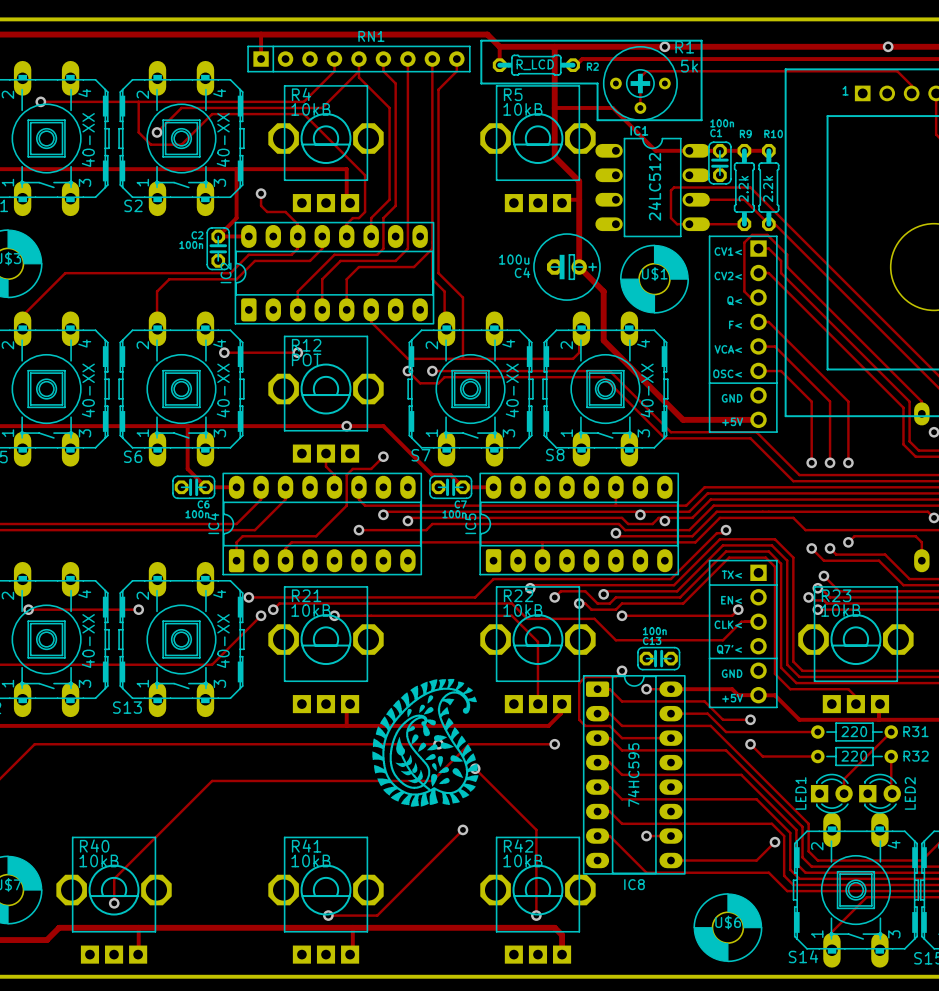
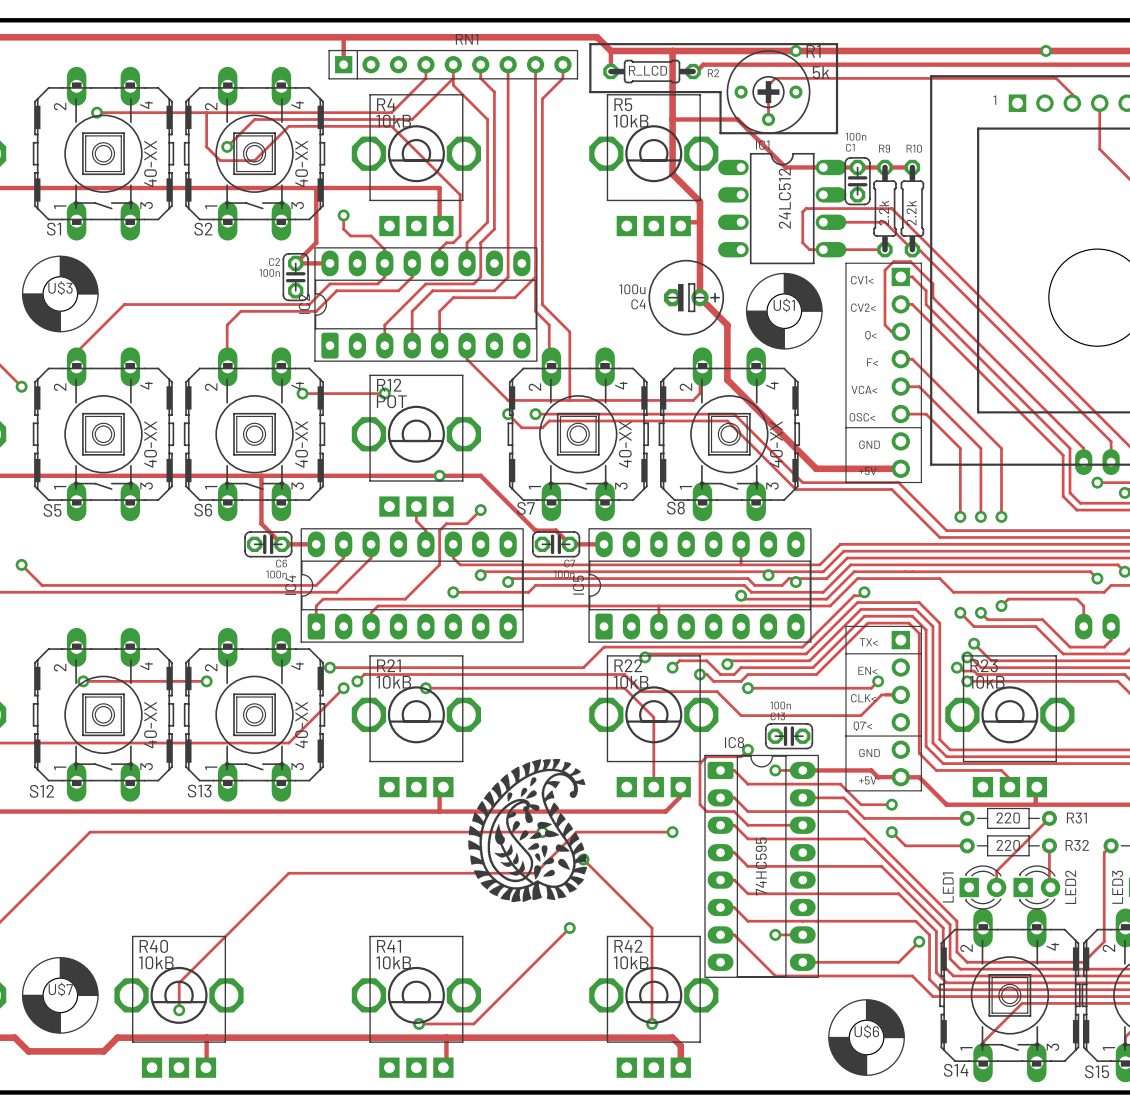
IC8 name position: IC8 (634, 884) -> IC8 (734, 742)

